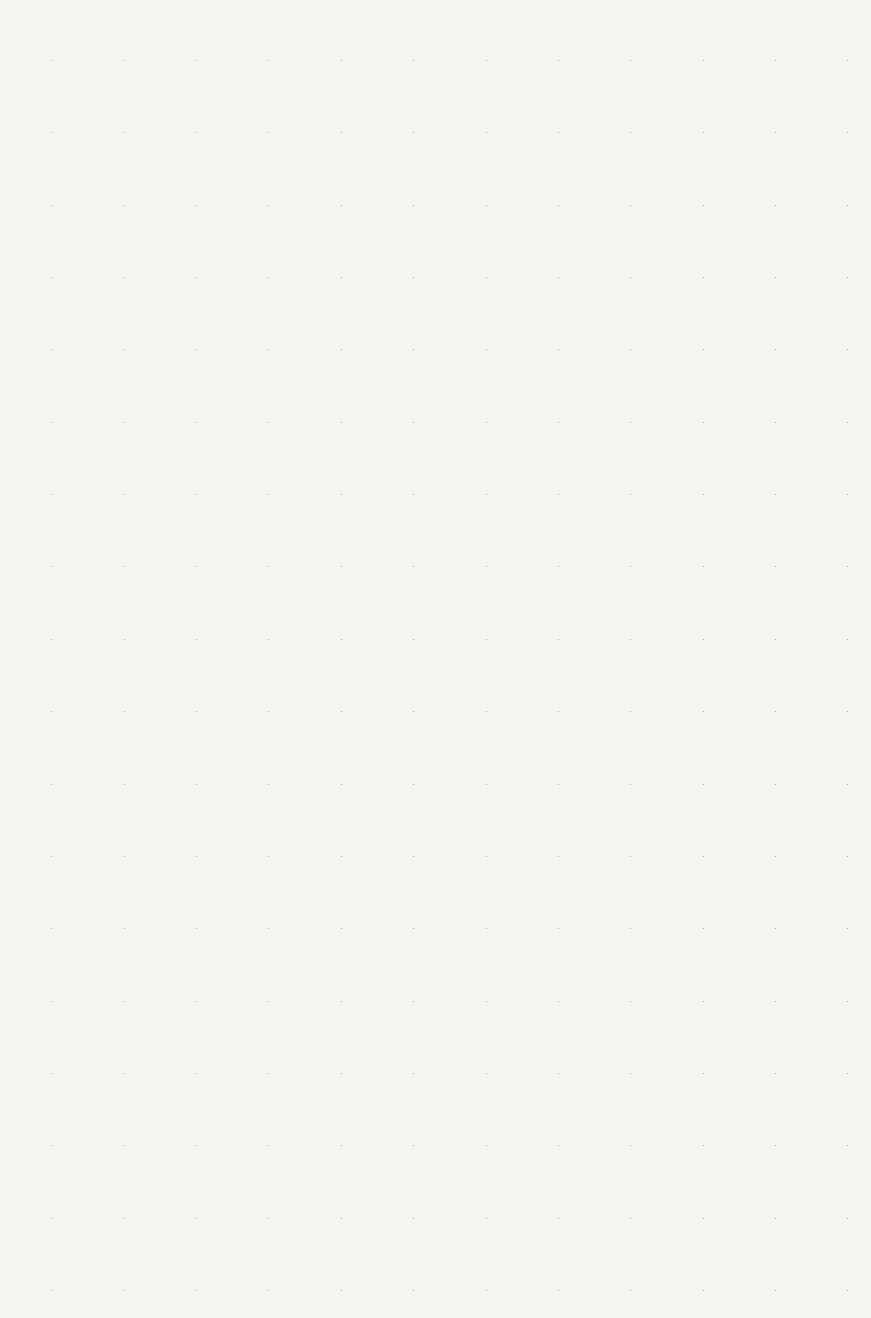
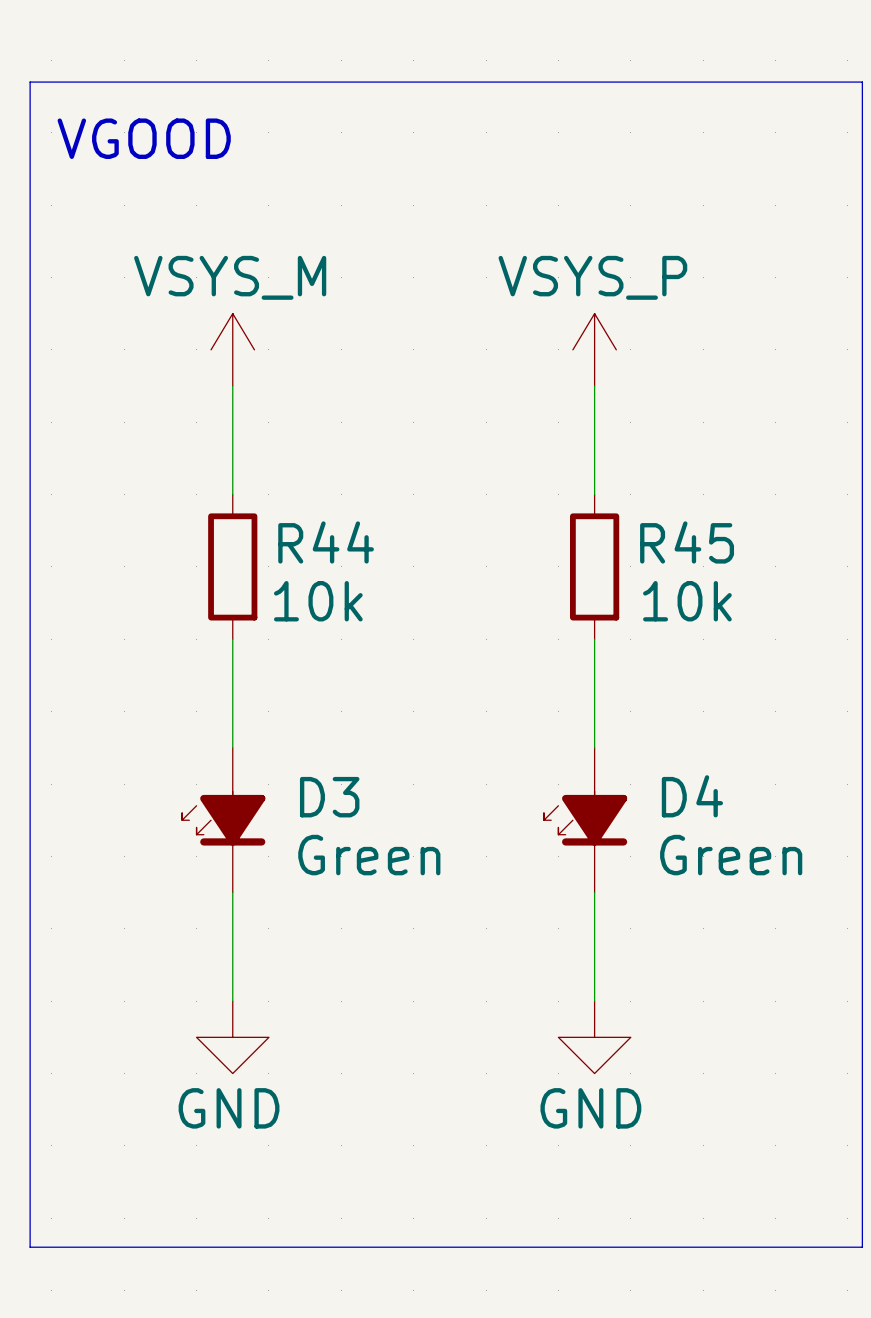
line: none -> (30, 82) (862, 82) (862, 1247) (30, 1247) (30, 82)
text: none -> VGOOD (144, 138)
power symbol: none -> VSYS_M (232, 349)
power symbol: none -> VSYS_P (594, 349)
wire: none -> (232, 386) (232, 494)
wire: none -> (594, 386) (594, 494)
R44: none -> 10k (232, 566)
R45: none -> 10k (594, 566)
wire: none -> (232, 639) (232, 747)
wire: none -> (594, 639) (594, 747)
D3: none -> (223, 820)
D4: none -> (585, 820)
wire: none -> (232, 892) (232, 1001)
wire: none -> (594, 892) (594, 1001)
power symbol: none -> GND (232, 1037)
power symbol: none -> GND (594, 1037)

